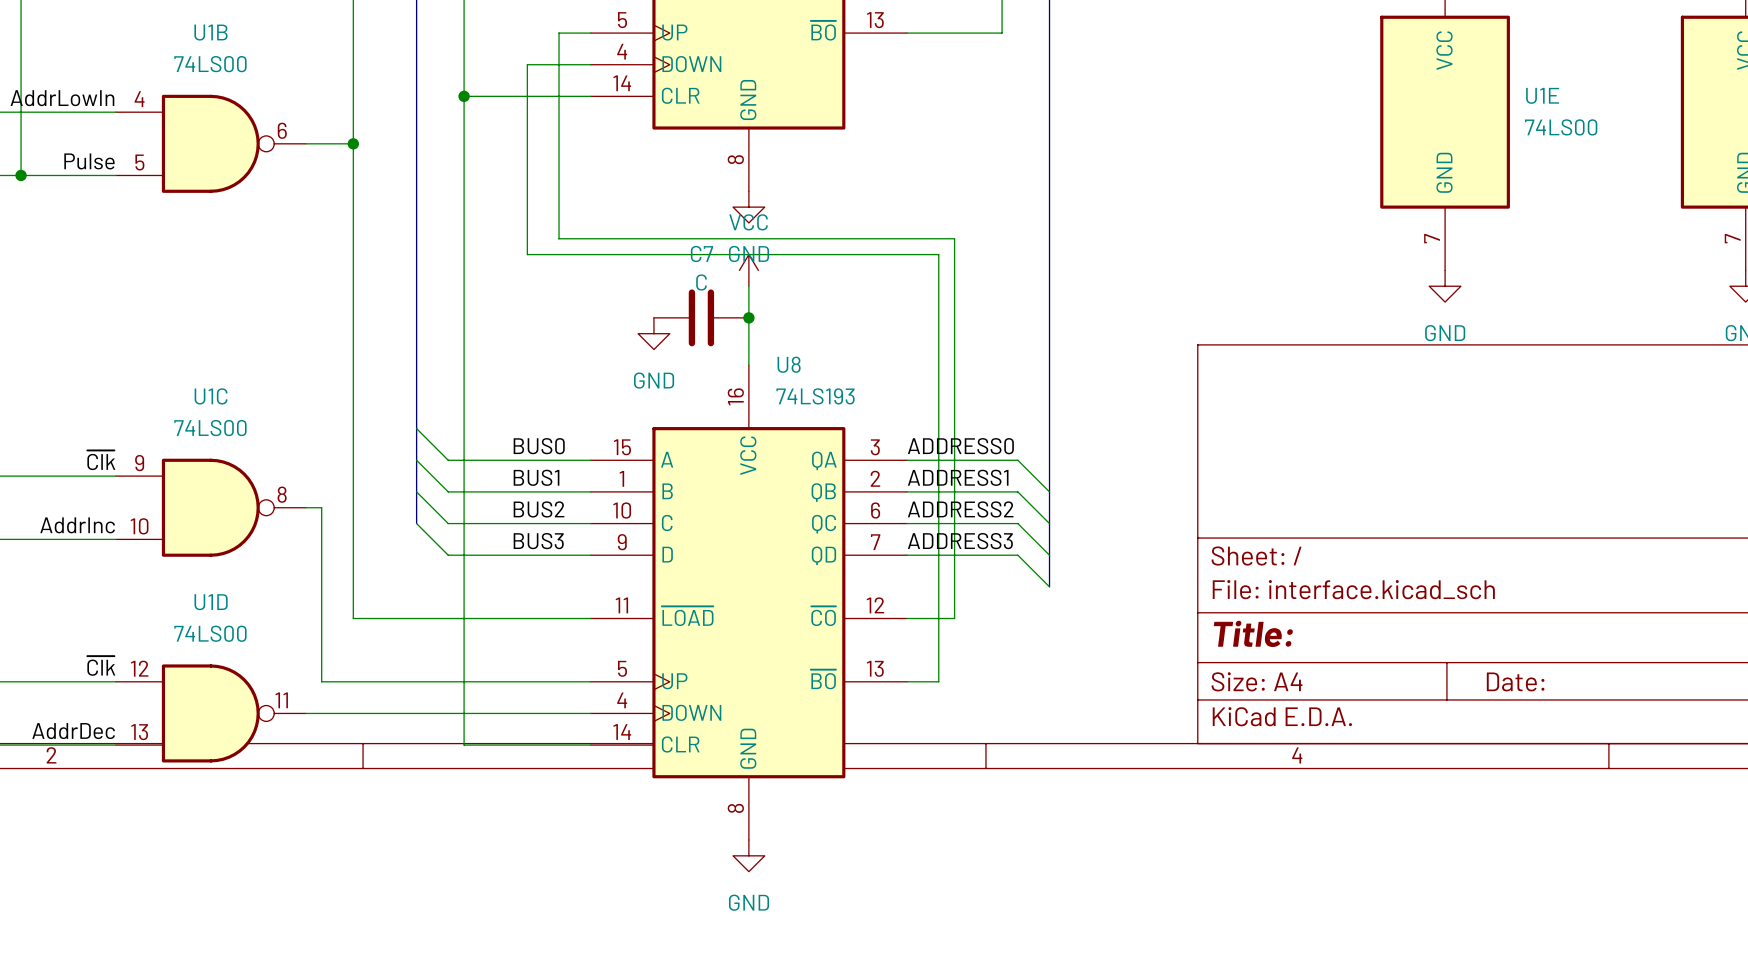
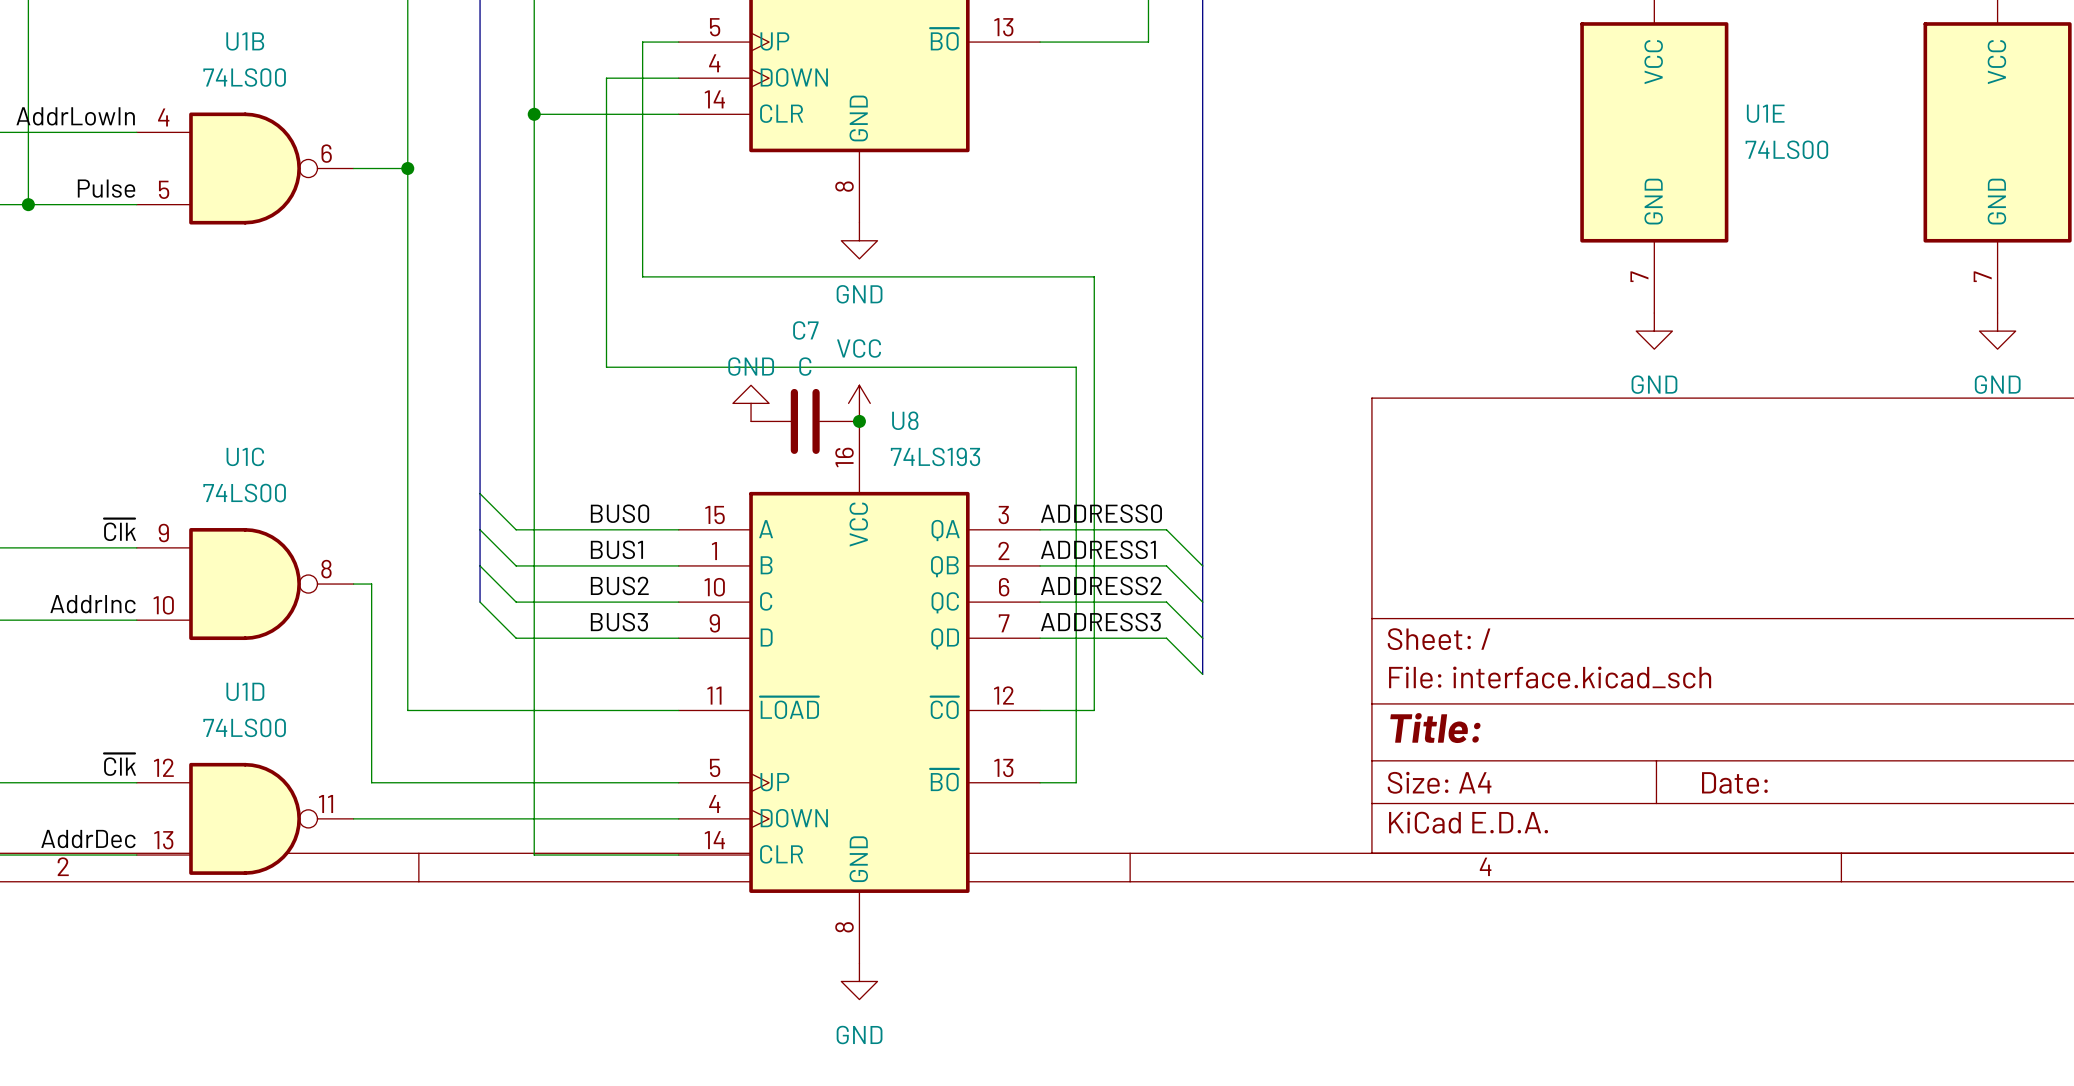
wire: (527, 254) (938, 254) (938, 317) -> (606, 294) (606, 367) (1076, 367)
C7 name position: C7 (701, 254) -> C7 (805, 330)
power symbol position: VCC (748, 270) -> VCC (859, 403)
C7 value position: C (701, 282) -> C (805, 366)
wire: (748, 286) (748, 365) -> none
C7 position: (701, 317) -> (805, 421)
junction position: (748, 317) -> (859, 421)
power symbol rotation: 0° (653, 333) -> 180° (751, 403)

